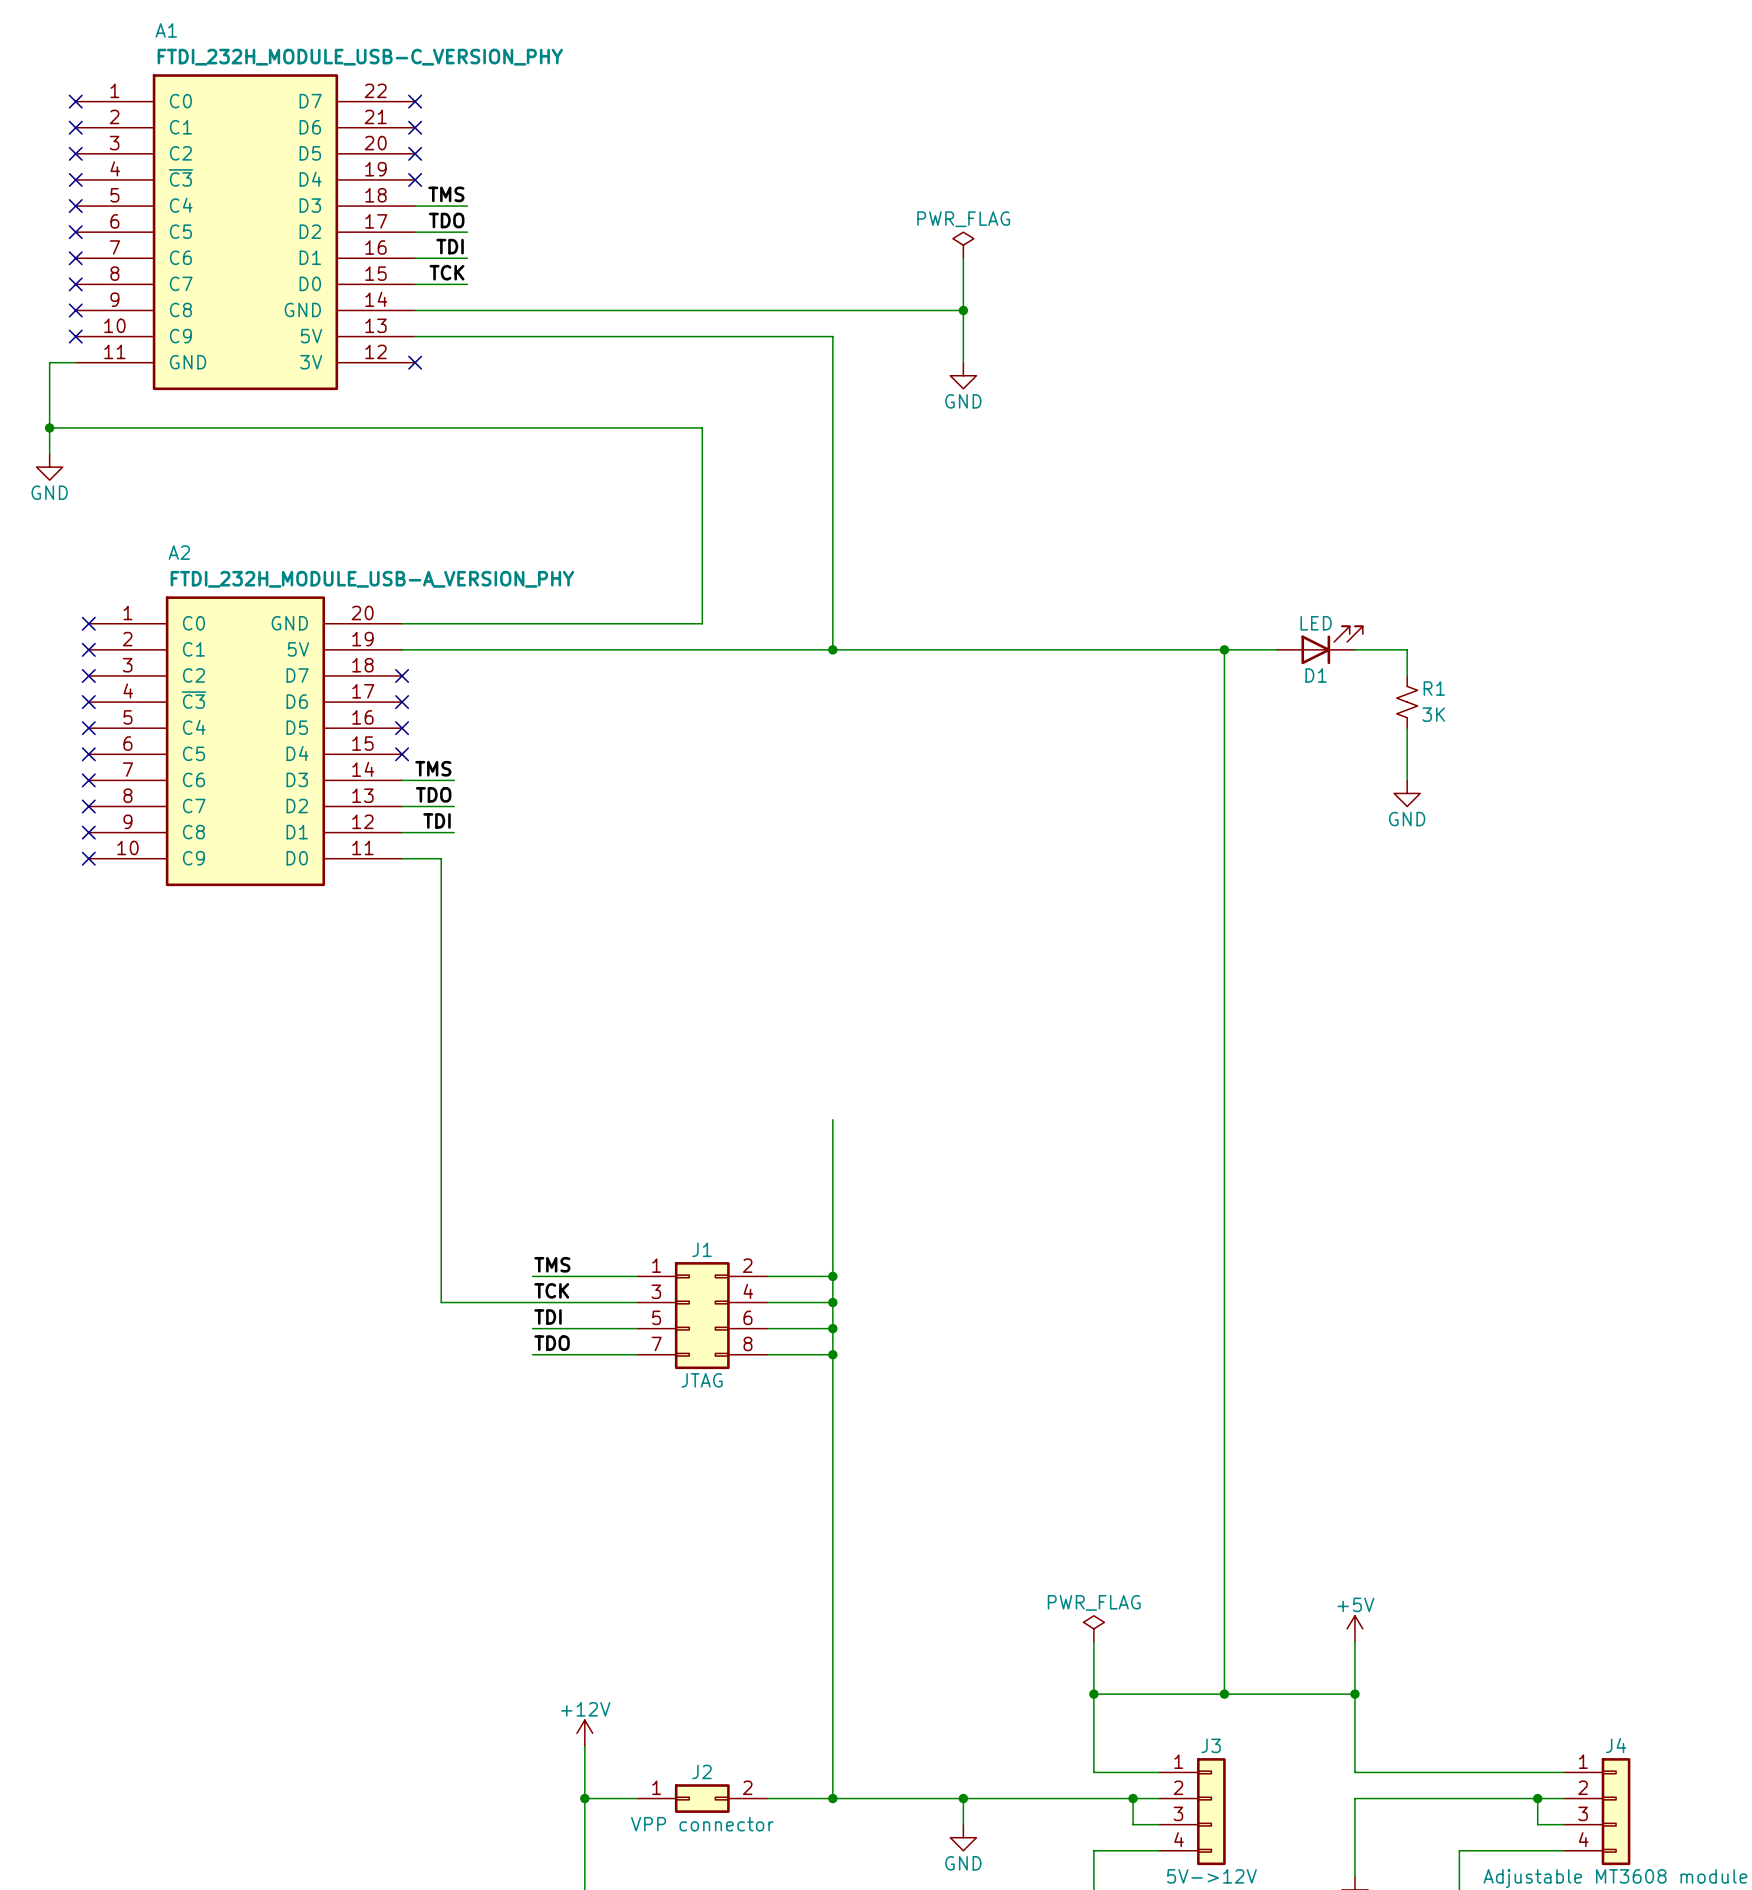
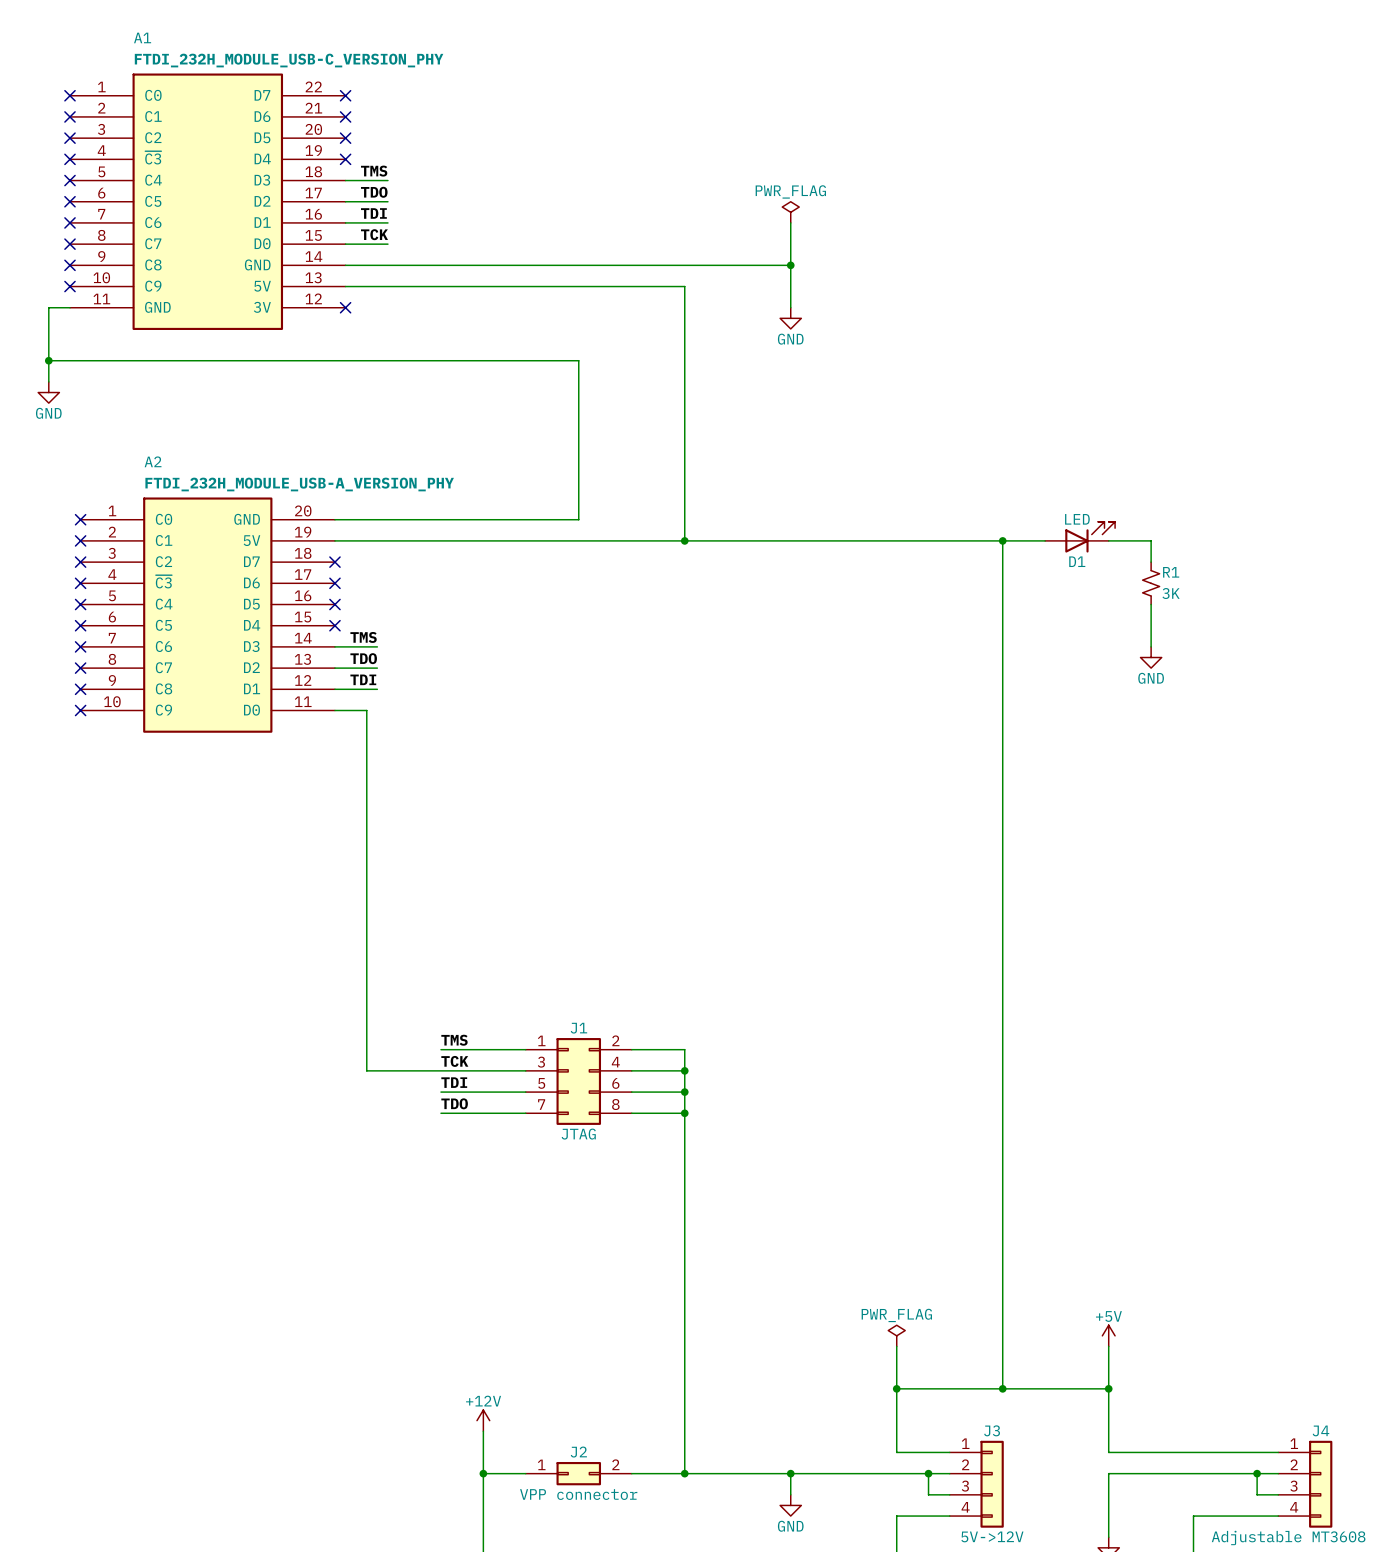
wire: (832, 1119) (832, 1276) -> none
junction: (832, 1276) -> none

